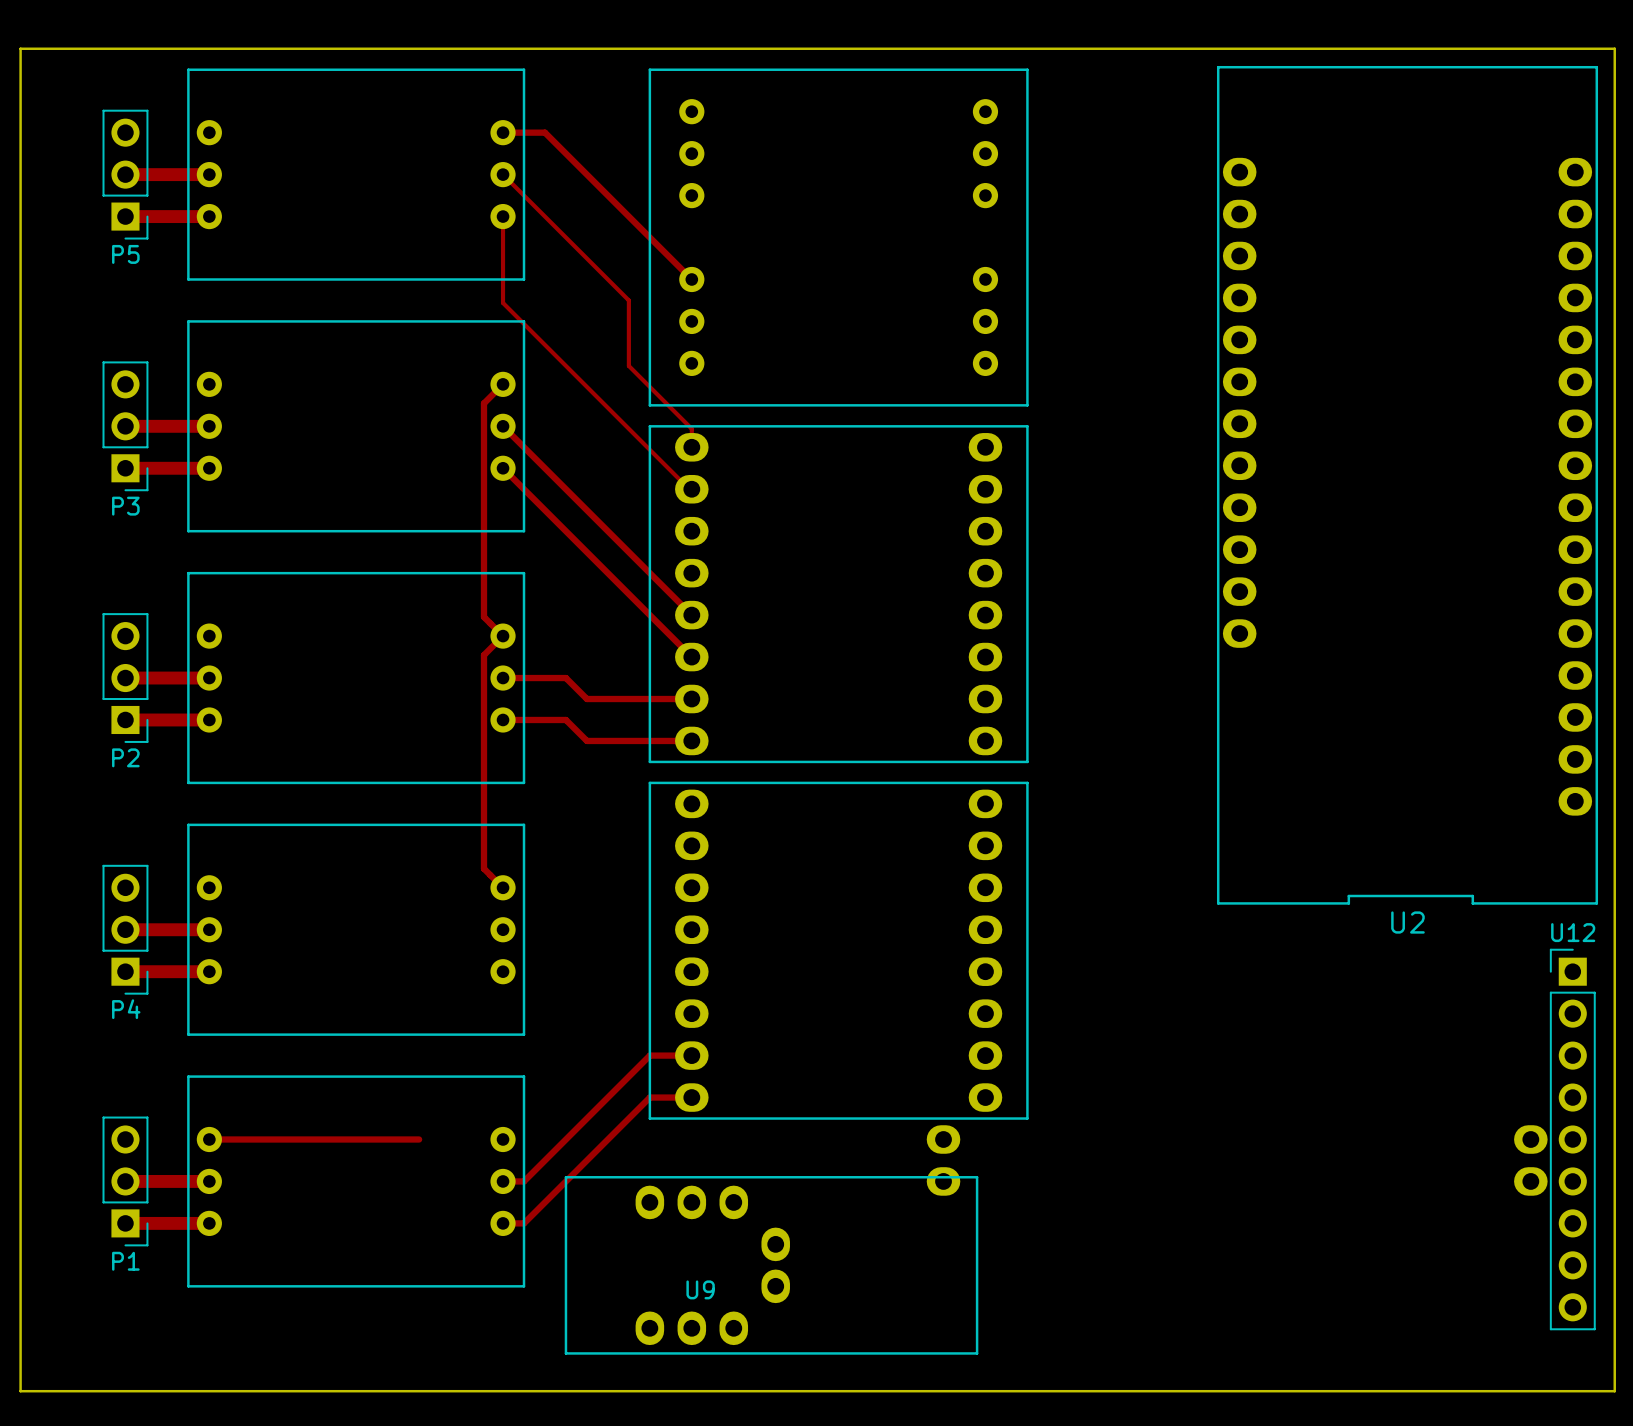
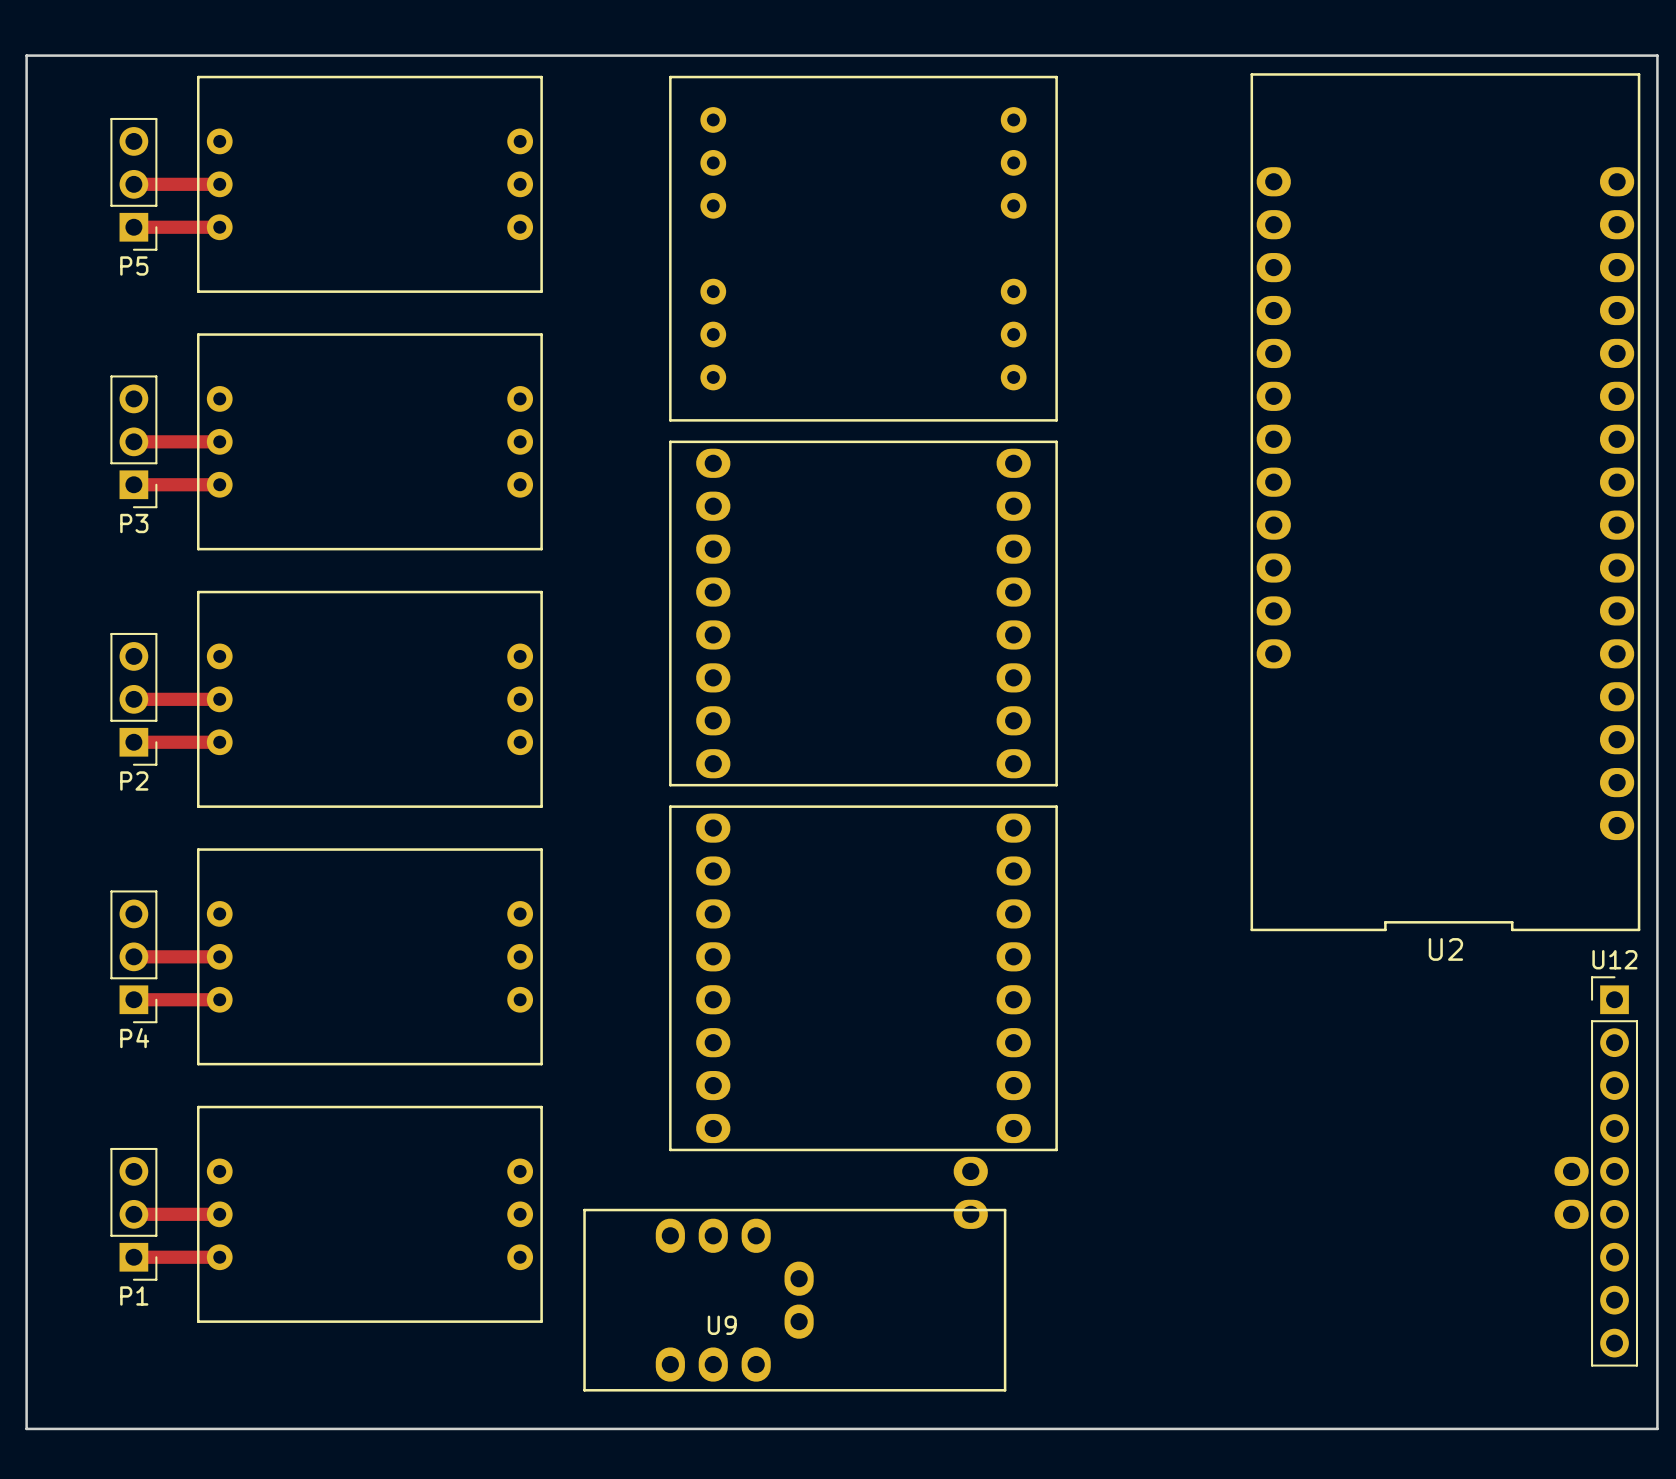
track: (503, 132) (544, 132) (691, 279) -> none
track: (503, 174) (628, 300) (628, 365) (691, 428) (691, 447) -> none
track: (503, 216) (503, 302) (689, 489) (691, 489) -> none
track: (503, 384) (483, 403) (483, 617) (503, 636) (483, 655) (483, 868) (503, 887) -> none
track: (503, 426) (691, 615) -> none
track: (503, 468) (691, 657) -> none
track: (503, 678) (565, 678) (586, 699) (691, 699) -> none
track: (503, 719) (565, 719) (586, 740) (691, 740) -> none
track: (691, 1055) (649, 1055) (524, 1181) (503, 1181) -> none
track: (691, 1097) (649, 1097) (524, 1223) (503, 1223) -> none
track: (209, 1139) (419, 1139) -> none

